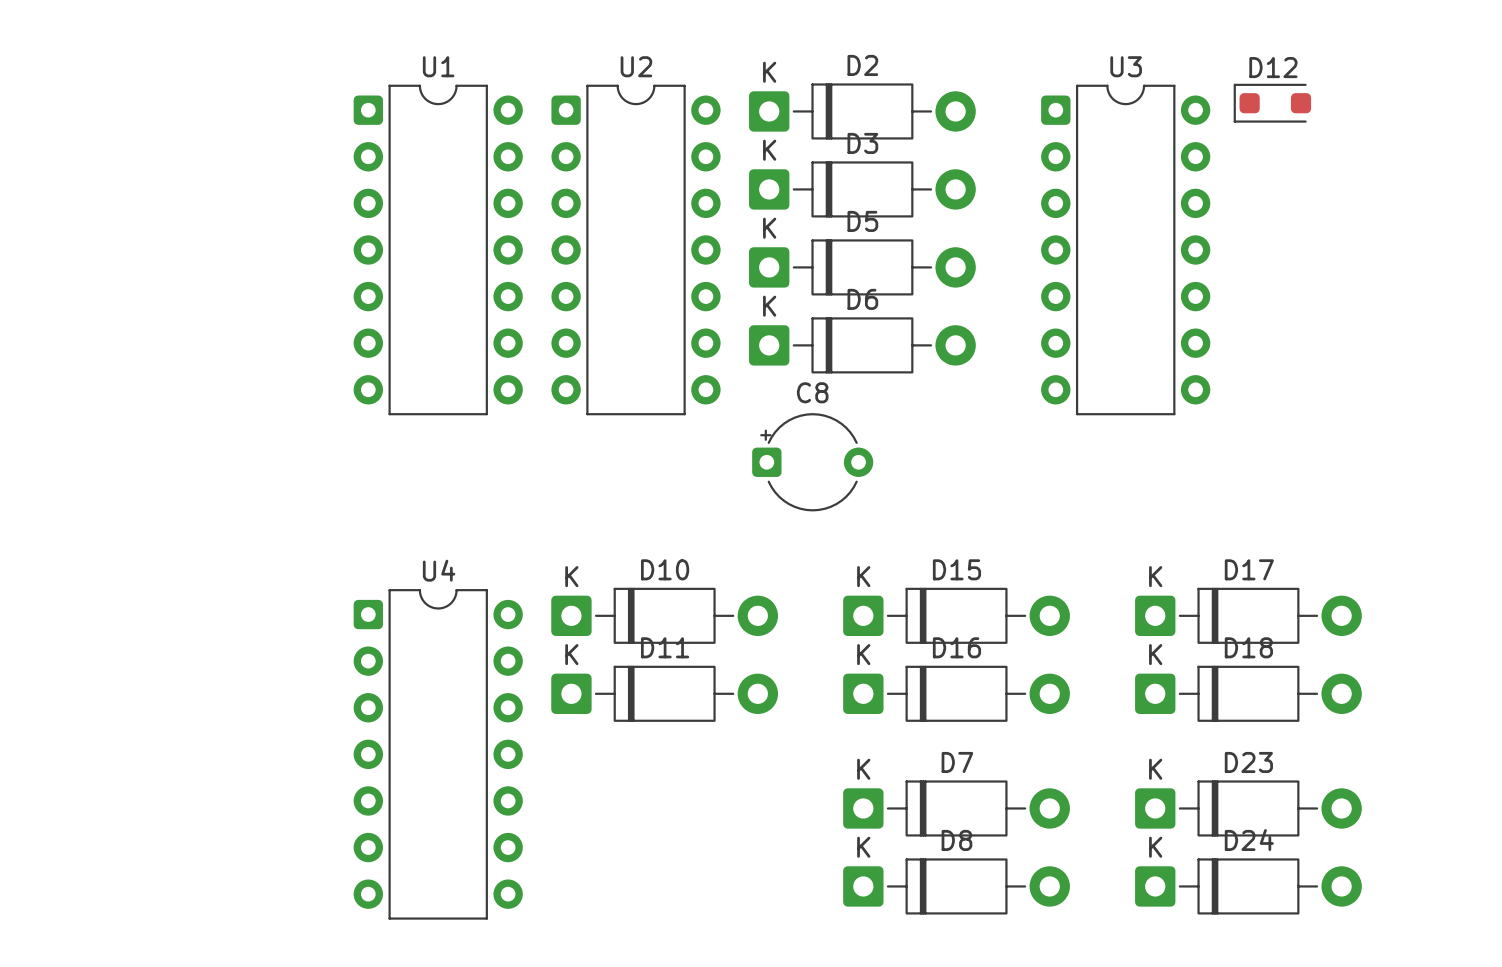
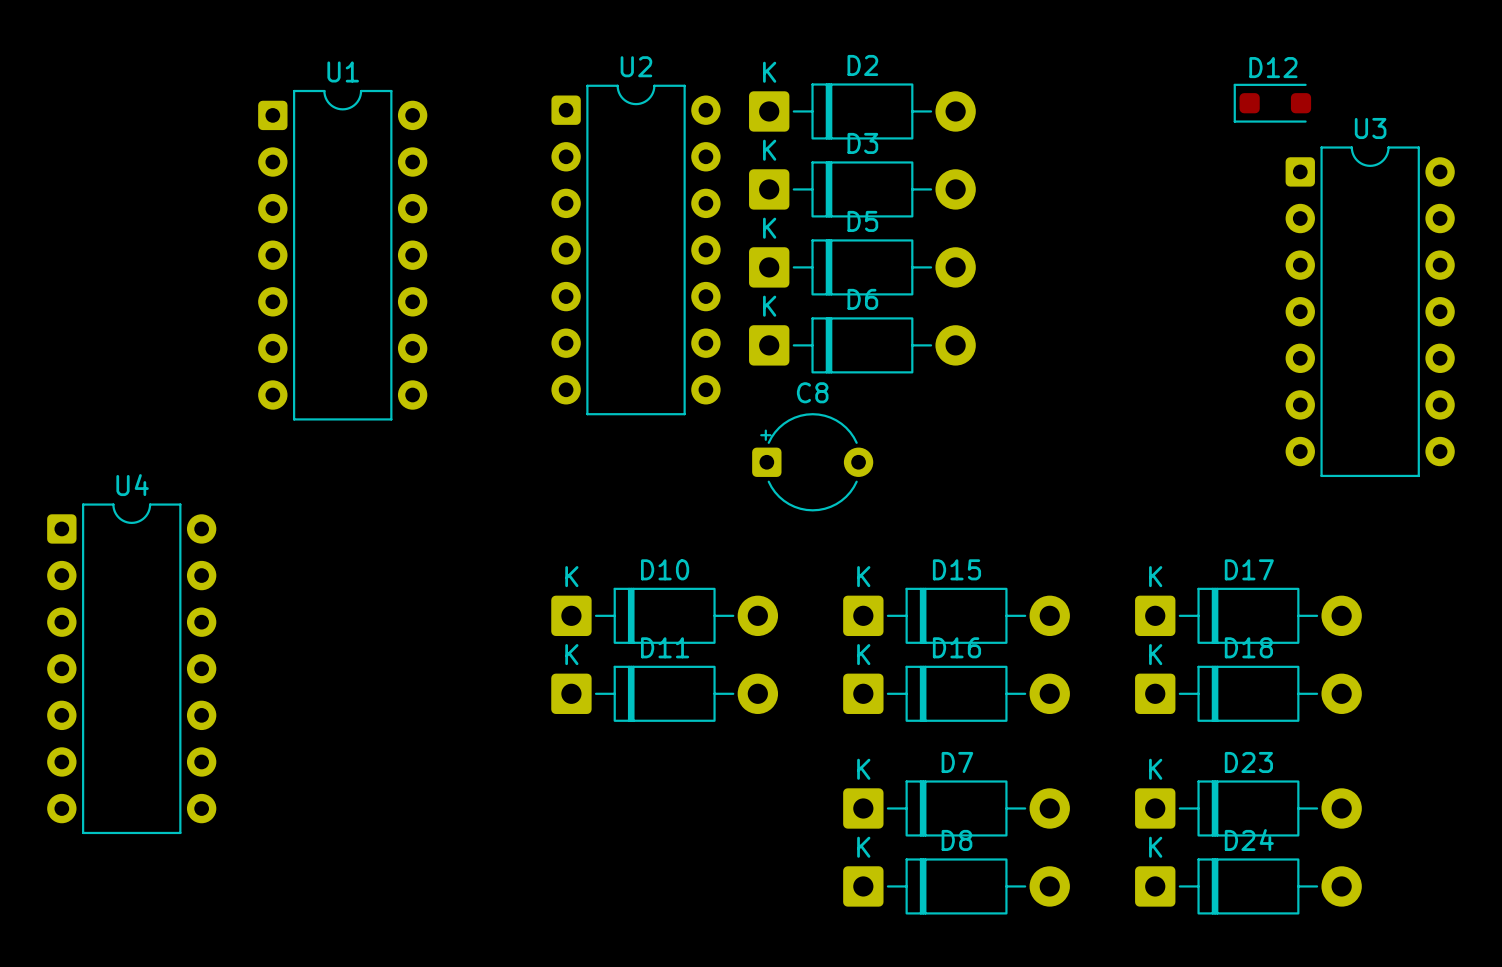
U1 position: (438, 249) -> (342, 255)
U3 position: (1125, 249) -> (1370, 311)
U4 position: (438, 754) -> (131, 668)

